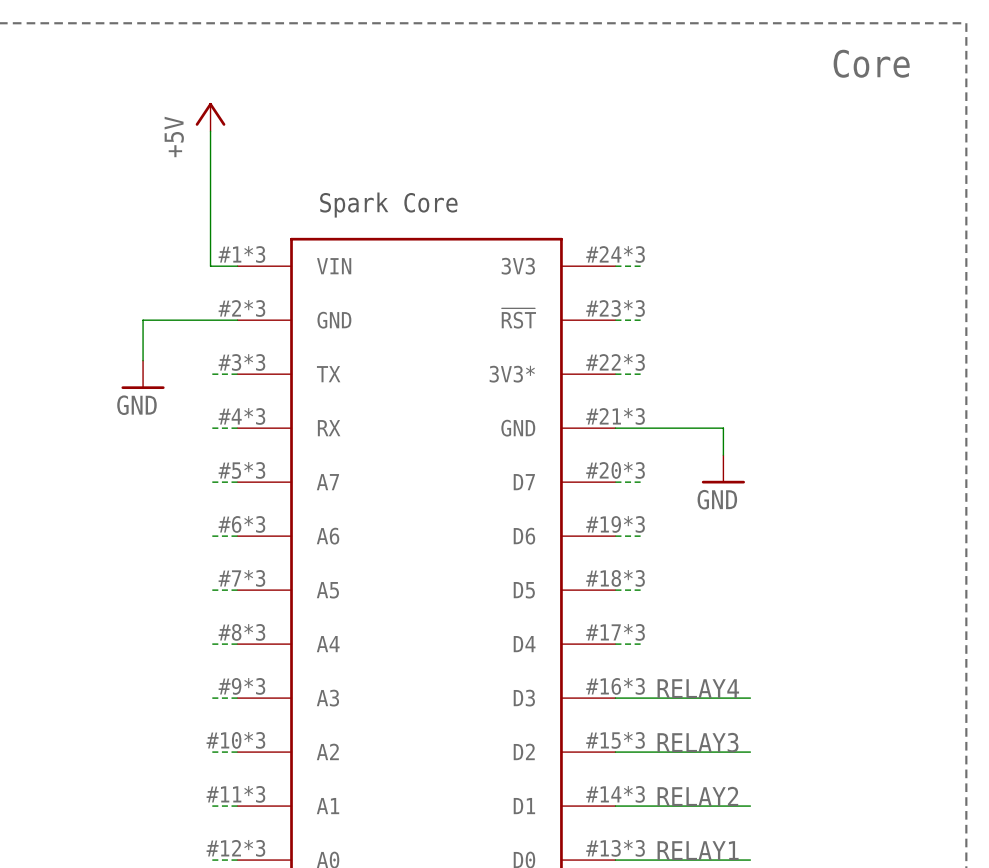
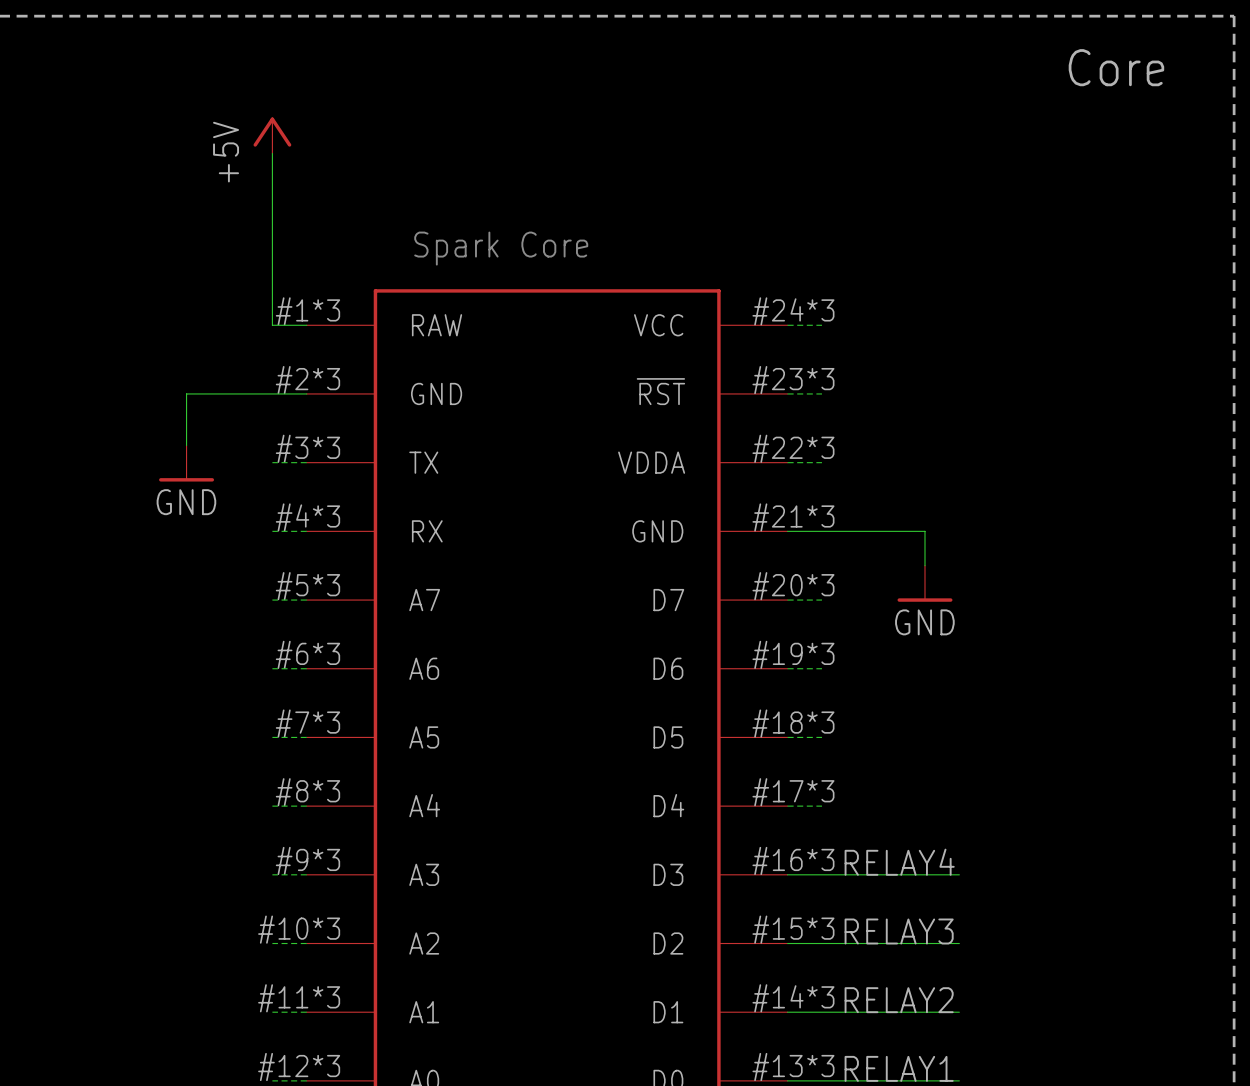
part pin name: VIN (334, 266) -> RAW (437, 325)
part pin name: 3V3 (518, 266) -> VCC (658, 325)
part pin name: 3V3* (512, 374) -> VDDA (651, 462)

